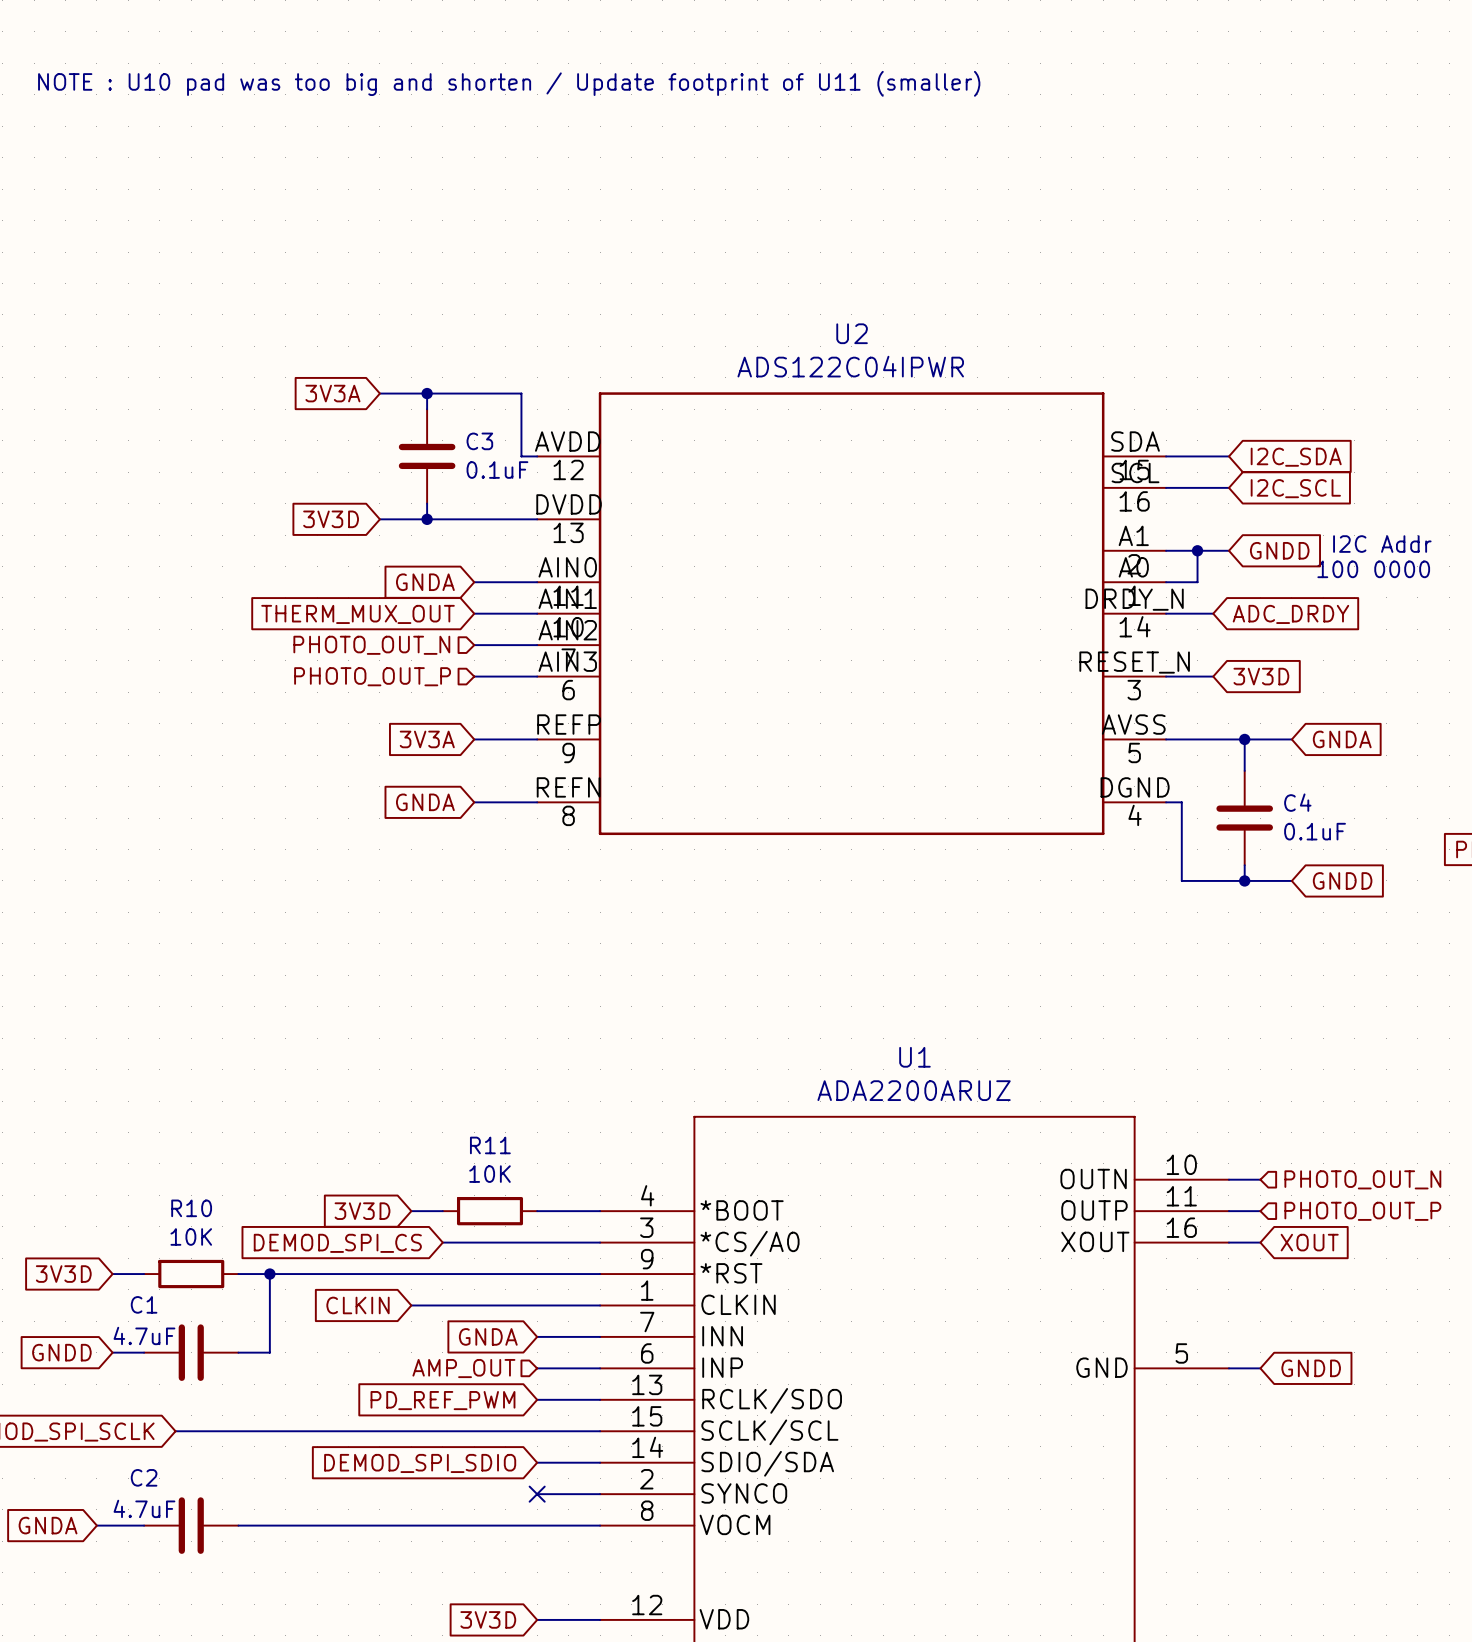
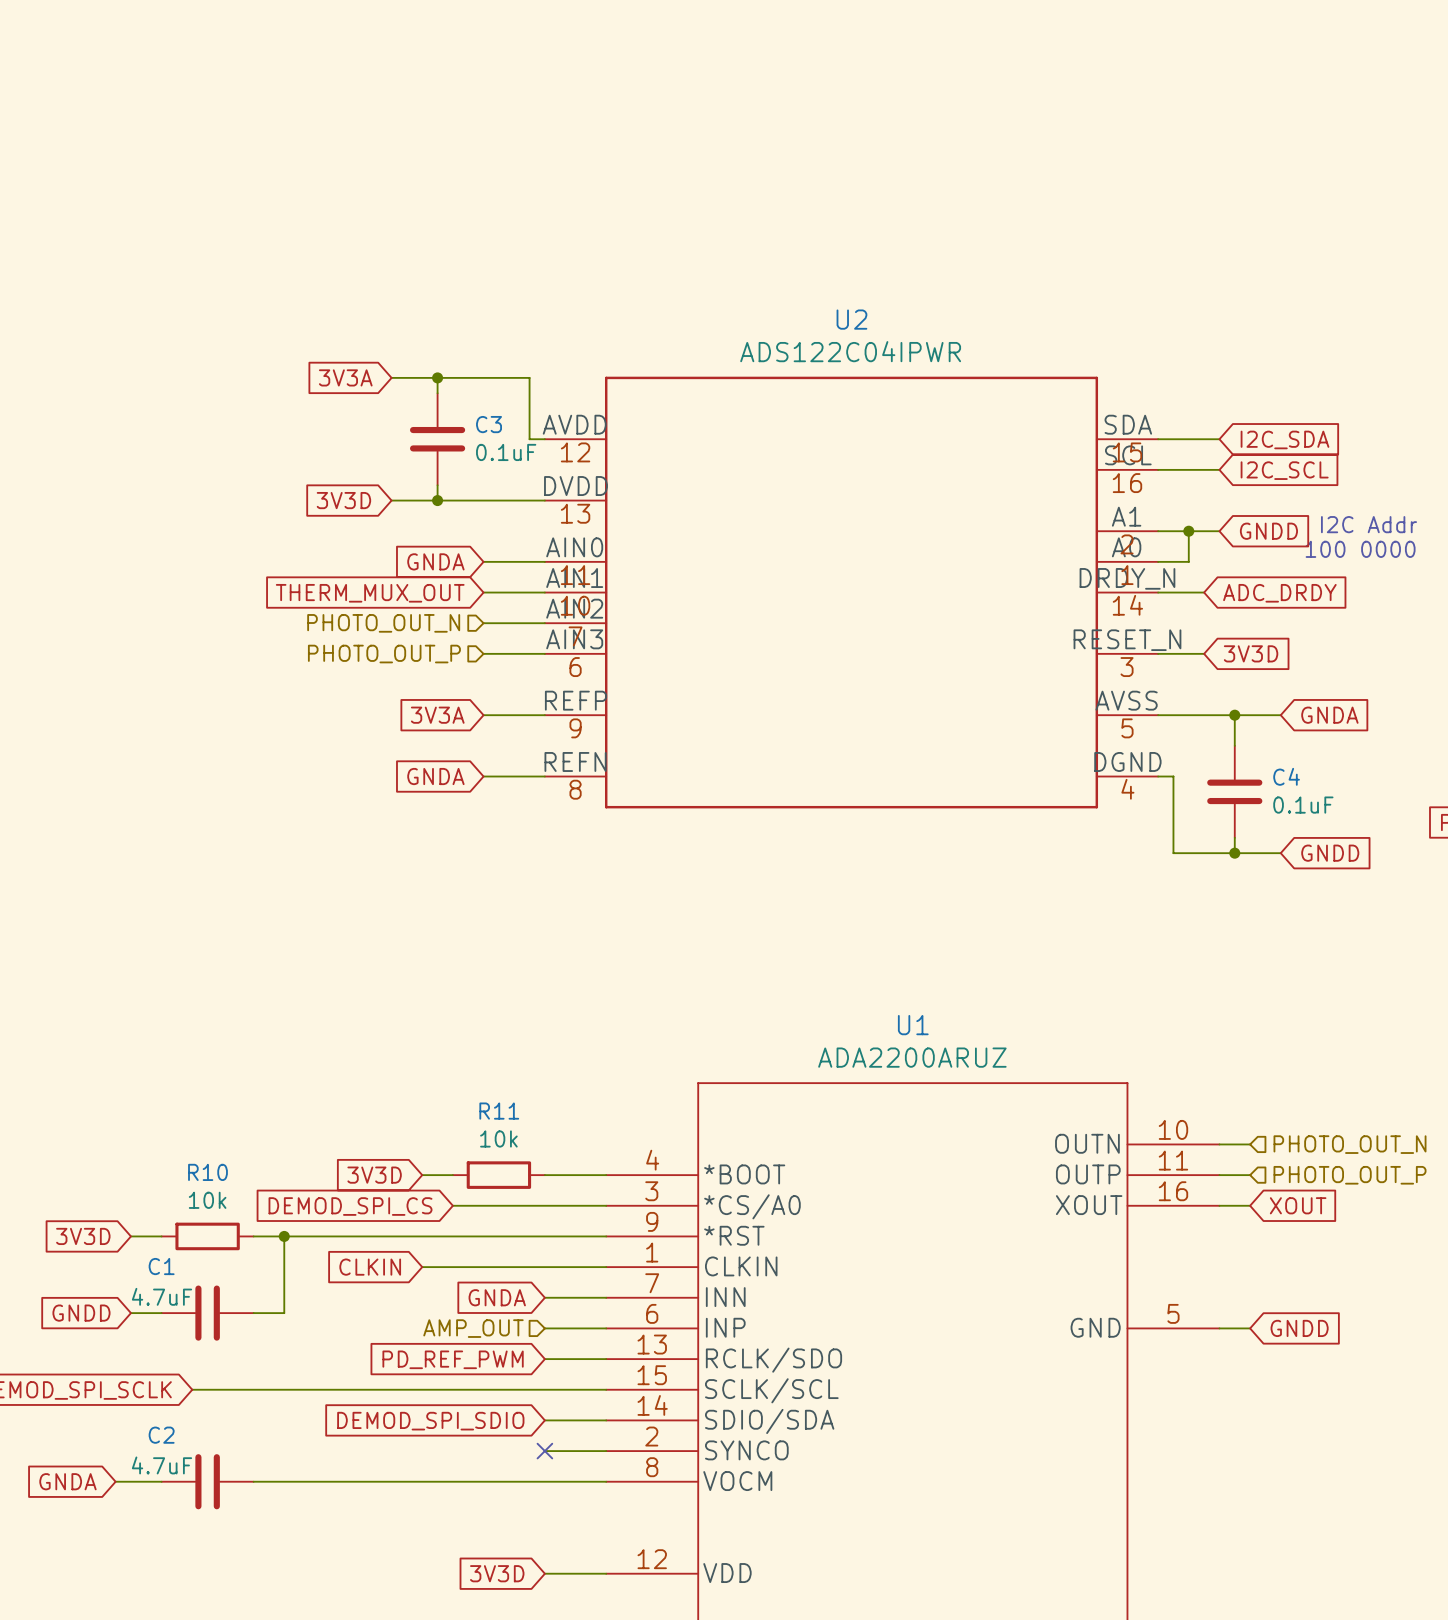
text: NOTE : U10 pad was too big and shorten / Update footprint of U11 (smaller) (509, 83) -> none
R11 value: 10K (490, 1174) -> 10k (498, 1138)
R10 value: 10K (191, 1236) -> 10k (207, 1200)

